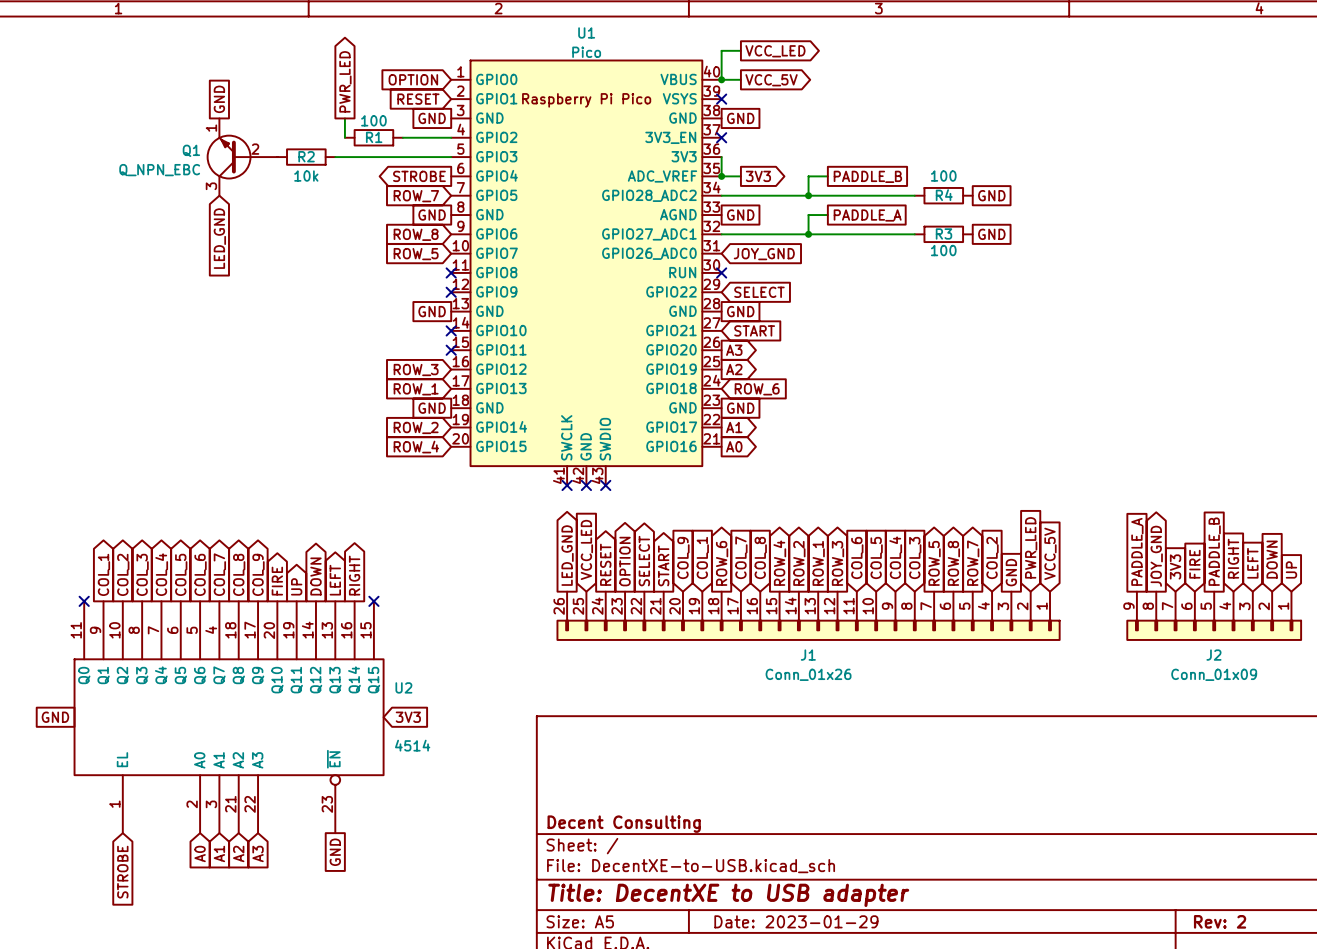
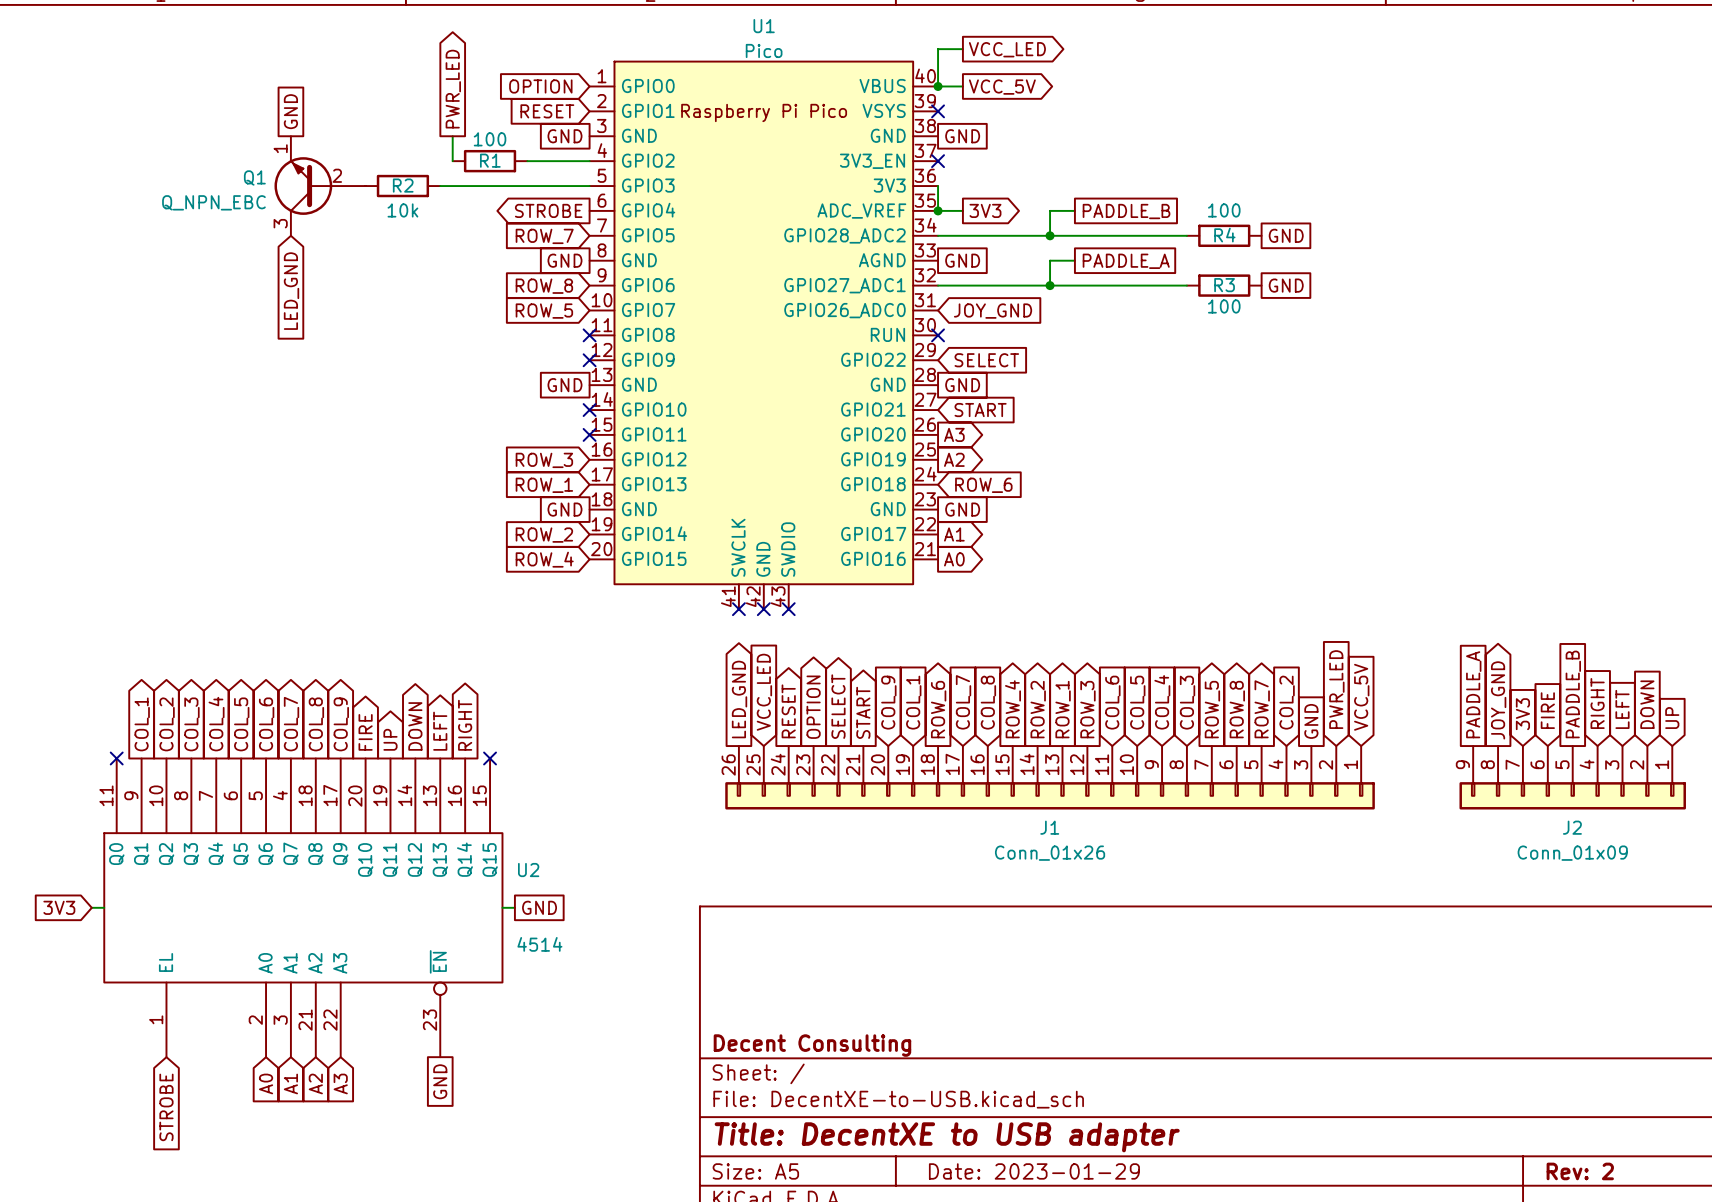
global label: none -> 3V3 (59, 907)
global label: GND (55, 717) -> none
wire: none -> (91, 907) (104, 907)
wire: none -> (502, 907) (514, 907)
global label: 3V3 (408, 717) -> none
global label: none -> GND (539, 907)

